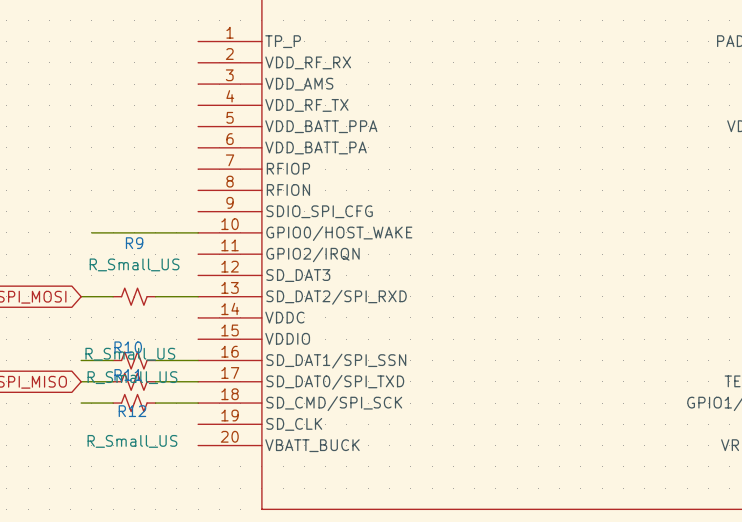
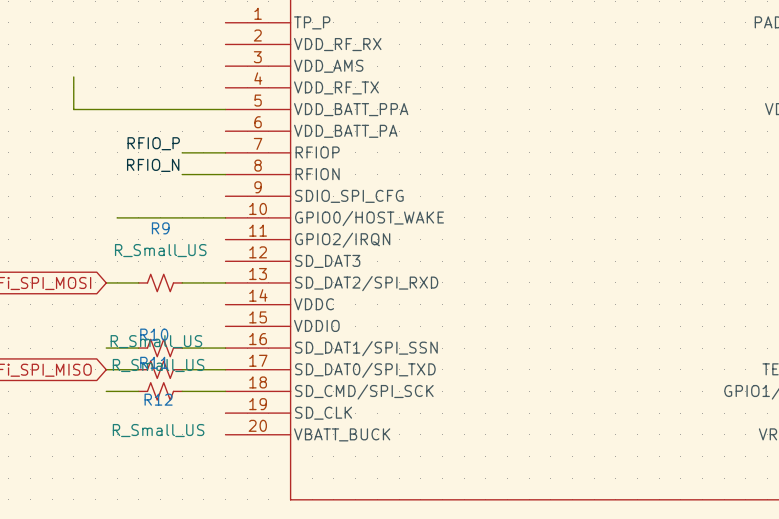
wire: none -> (73, 76) (73, 109) (225, 109)
label: none -> RFIO_P (153, 143)
wire: none -> (182, 152) (225, 152)
label: none -> RFIO_N (153, 165)
wire: none -> (182, 174) (225, 174)

